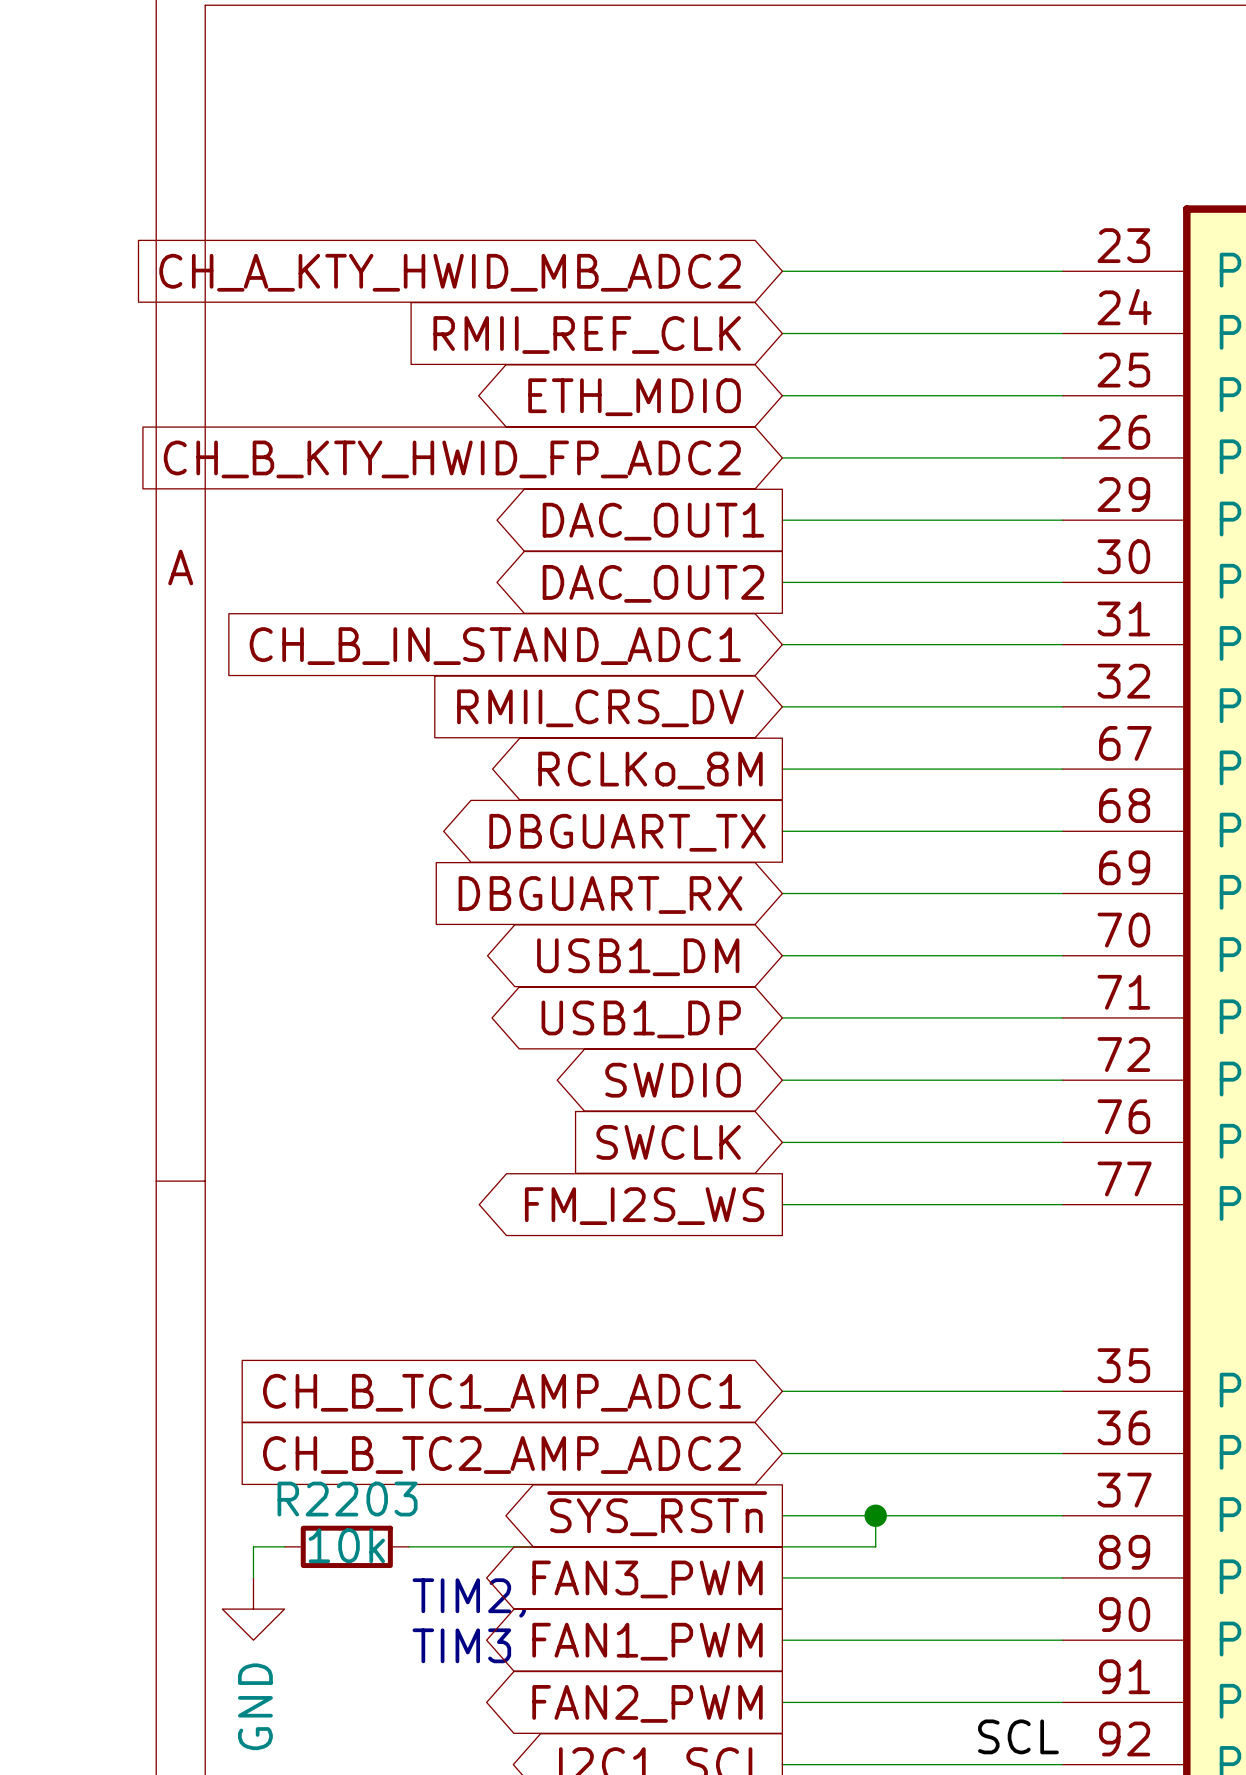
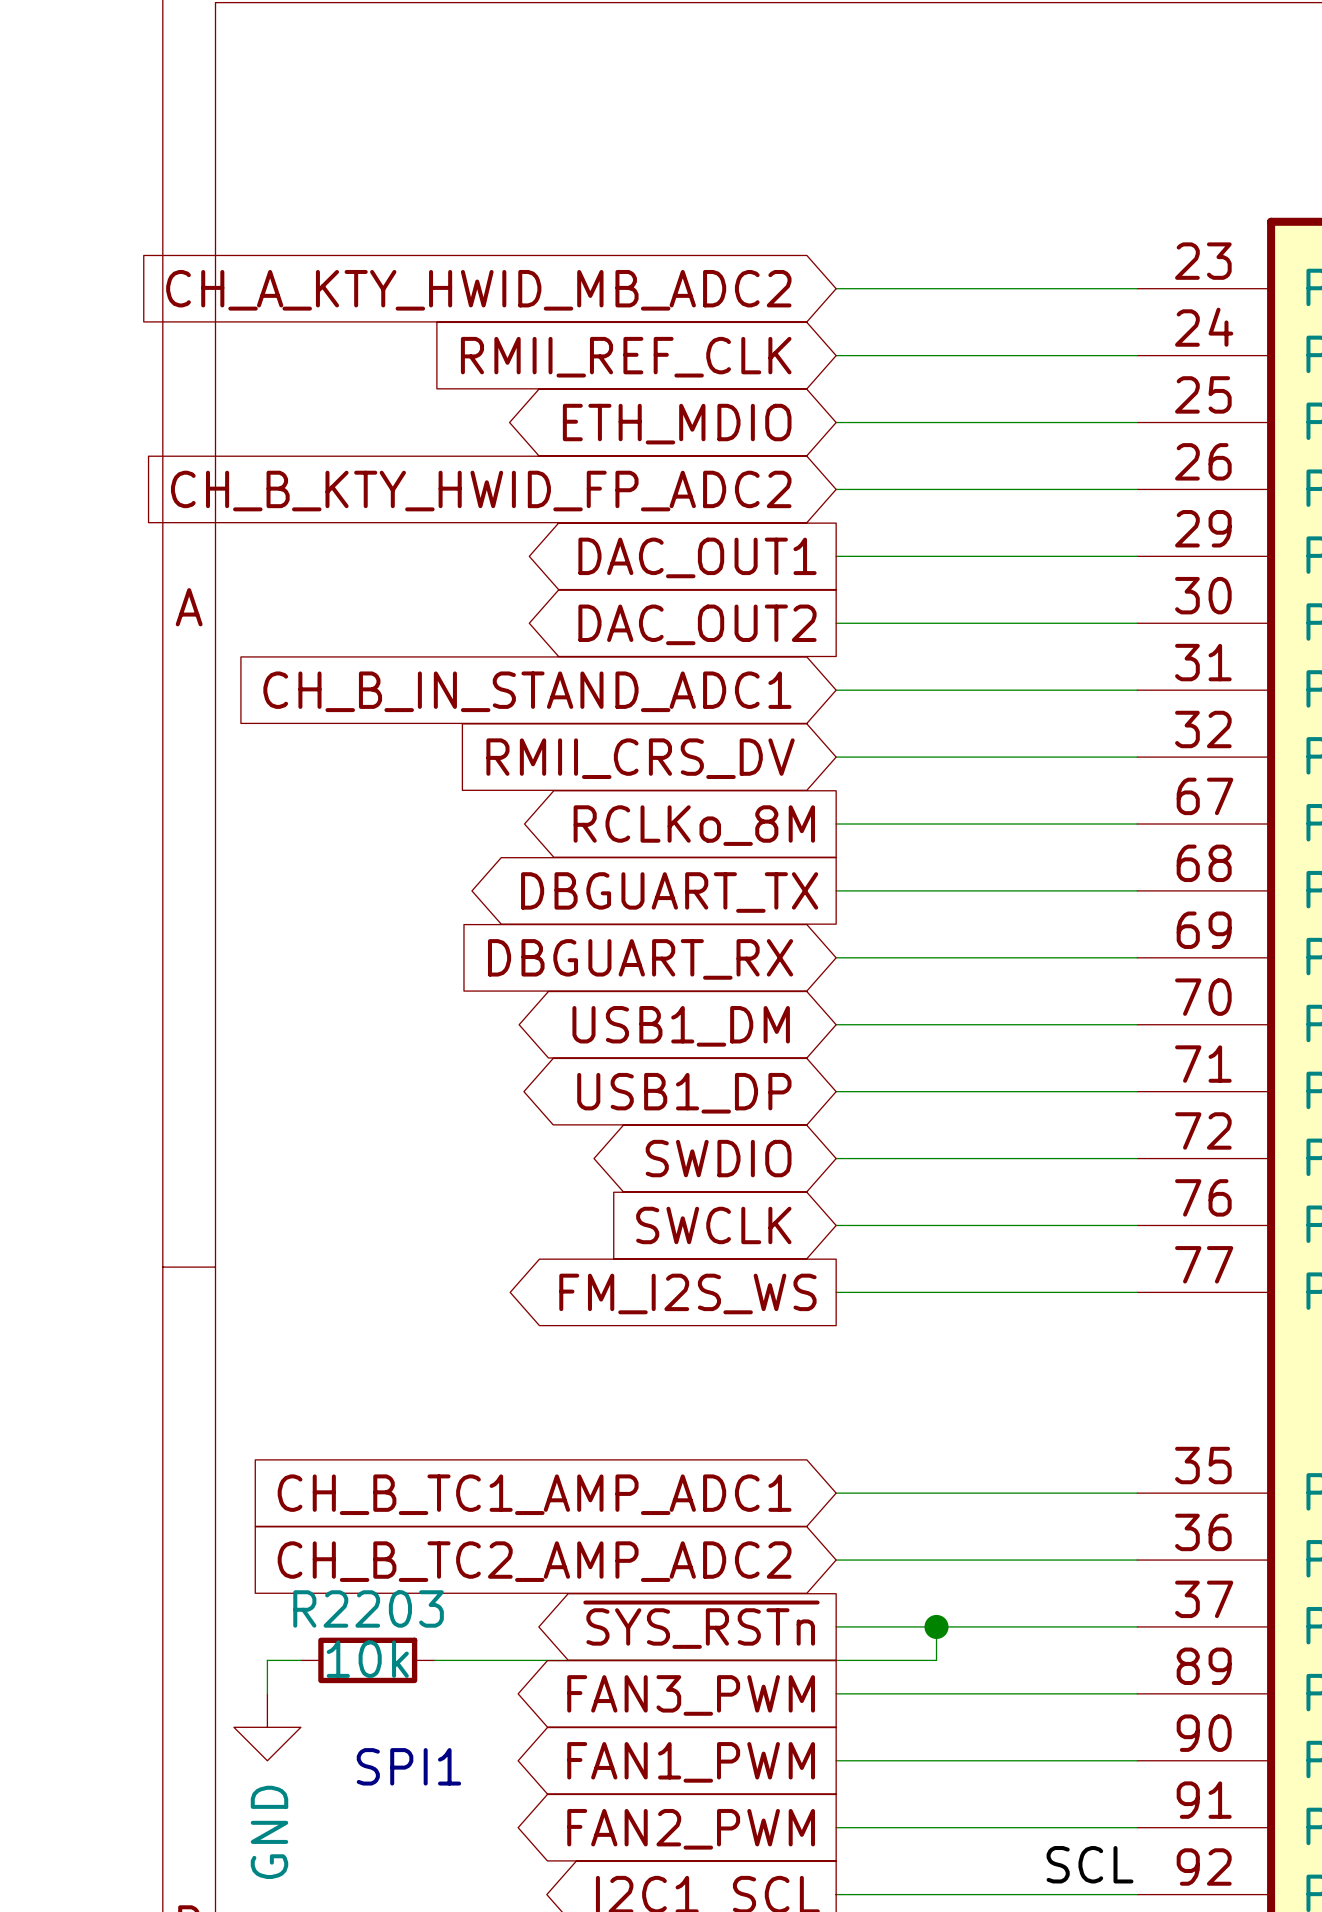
text: TIM2, (469, 1597) -> none
text: none -> SPI1 (408, 1766)
text: TIM3 (461, 1645) -> none

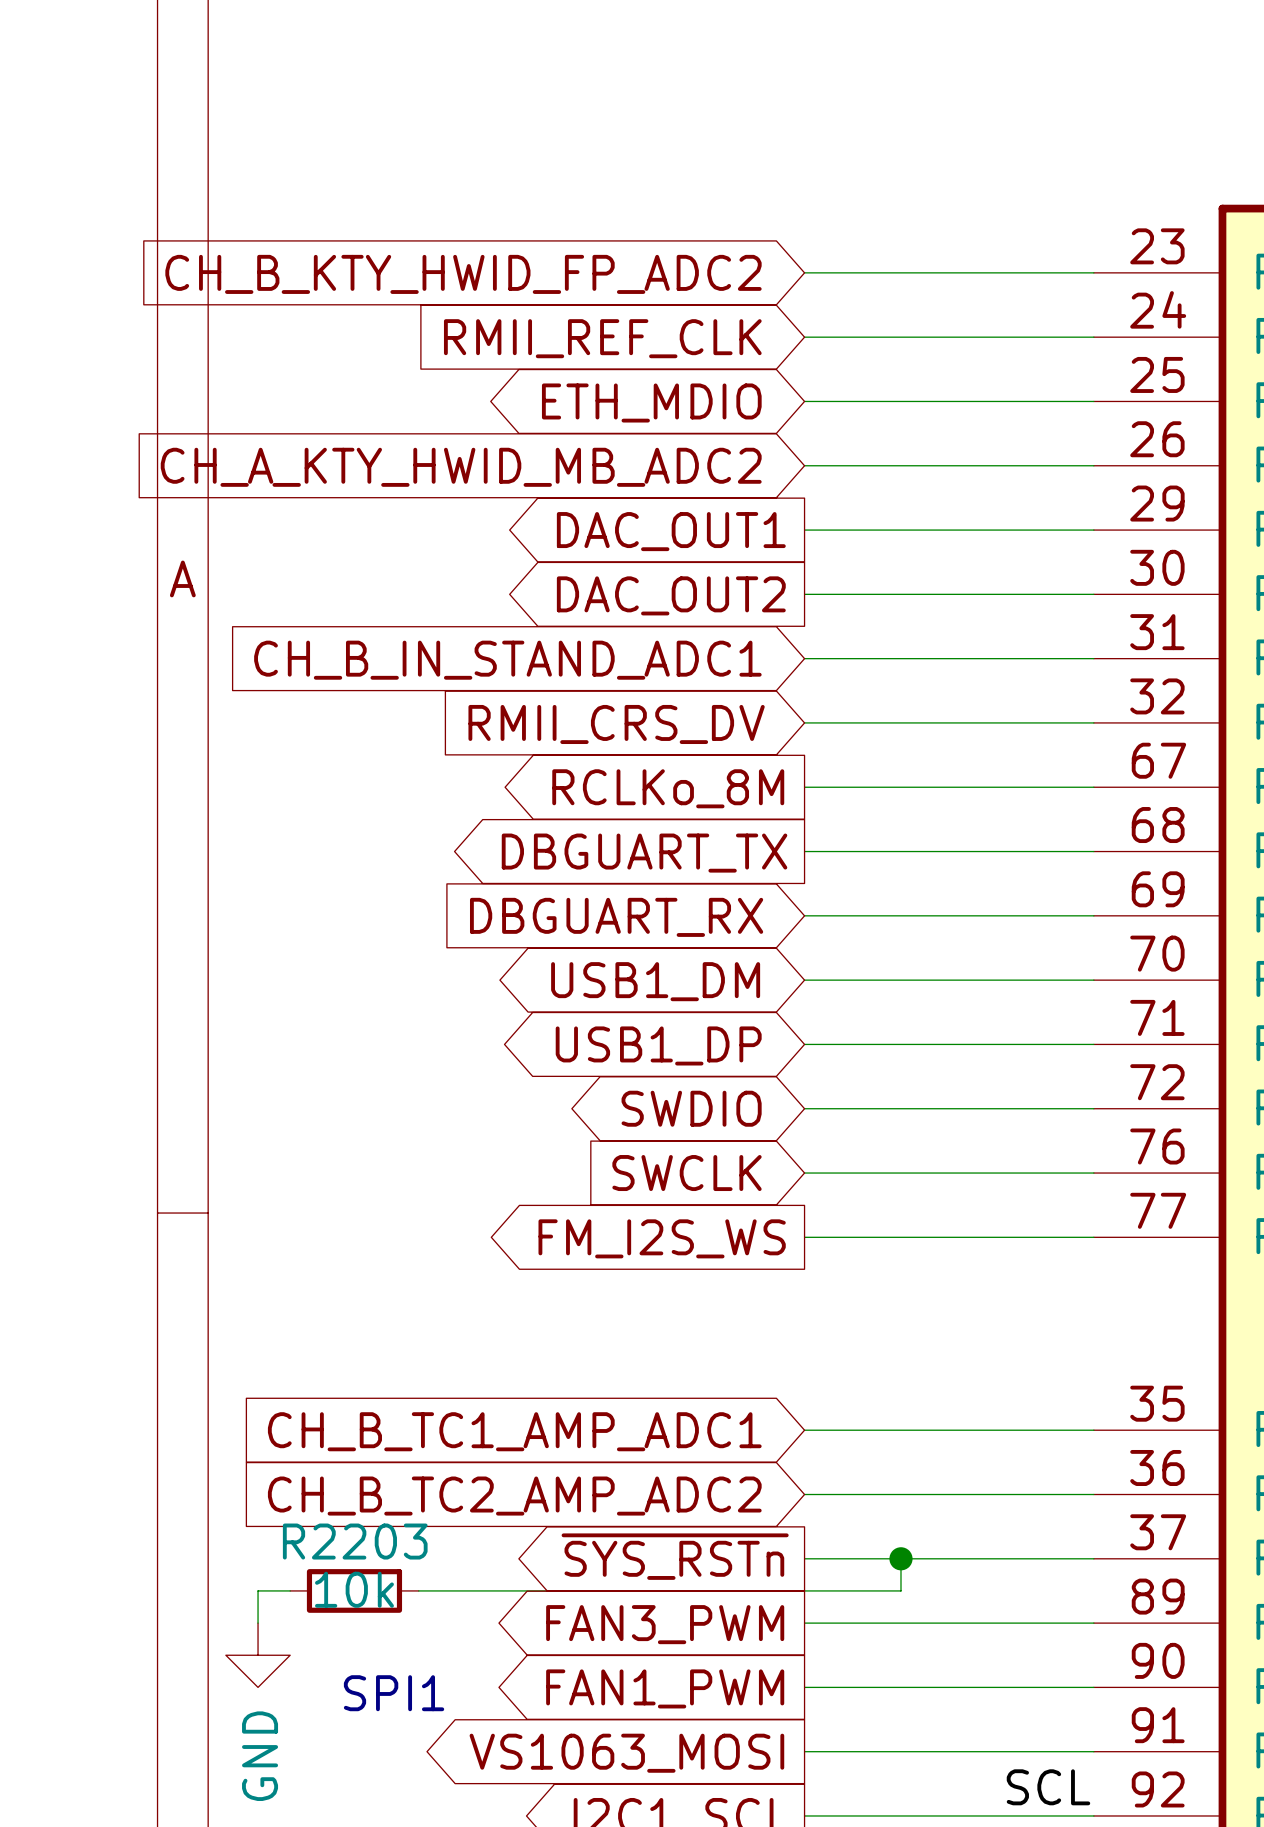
global label: CH_A_KTY_HWID_MB_ADC2 (478, 290) -> CH_B_KTY_HWID_FP_ADC2 (463, 274)
global label: CH_B_KTY_HWID_FP_ADC2 (481, 491) -> CH_A_KTY_HWID_MB_ADC2 (461, 467)
global label: FAN2_PWM (691, 1829) -> VS1063_MOSI (626, 1753)

